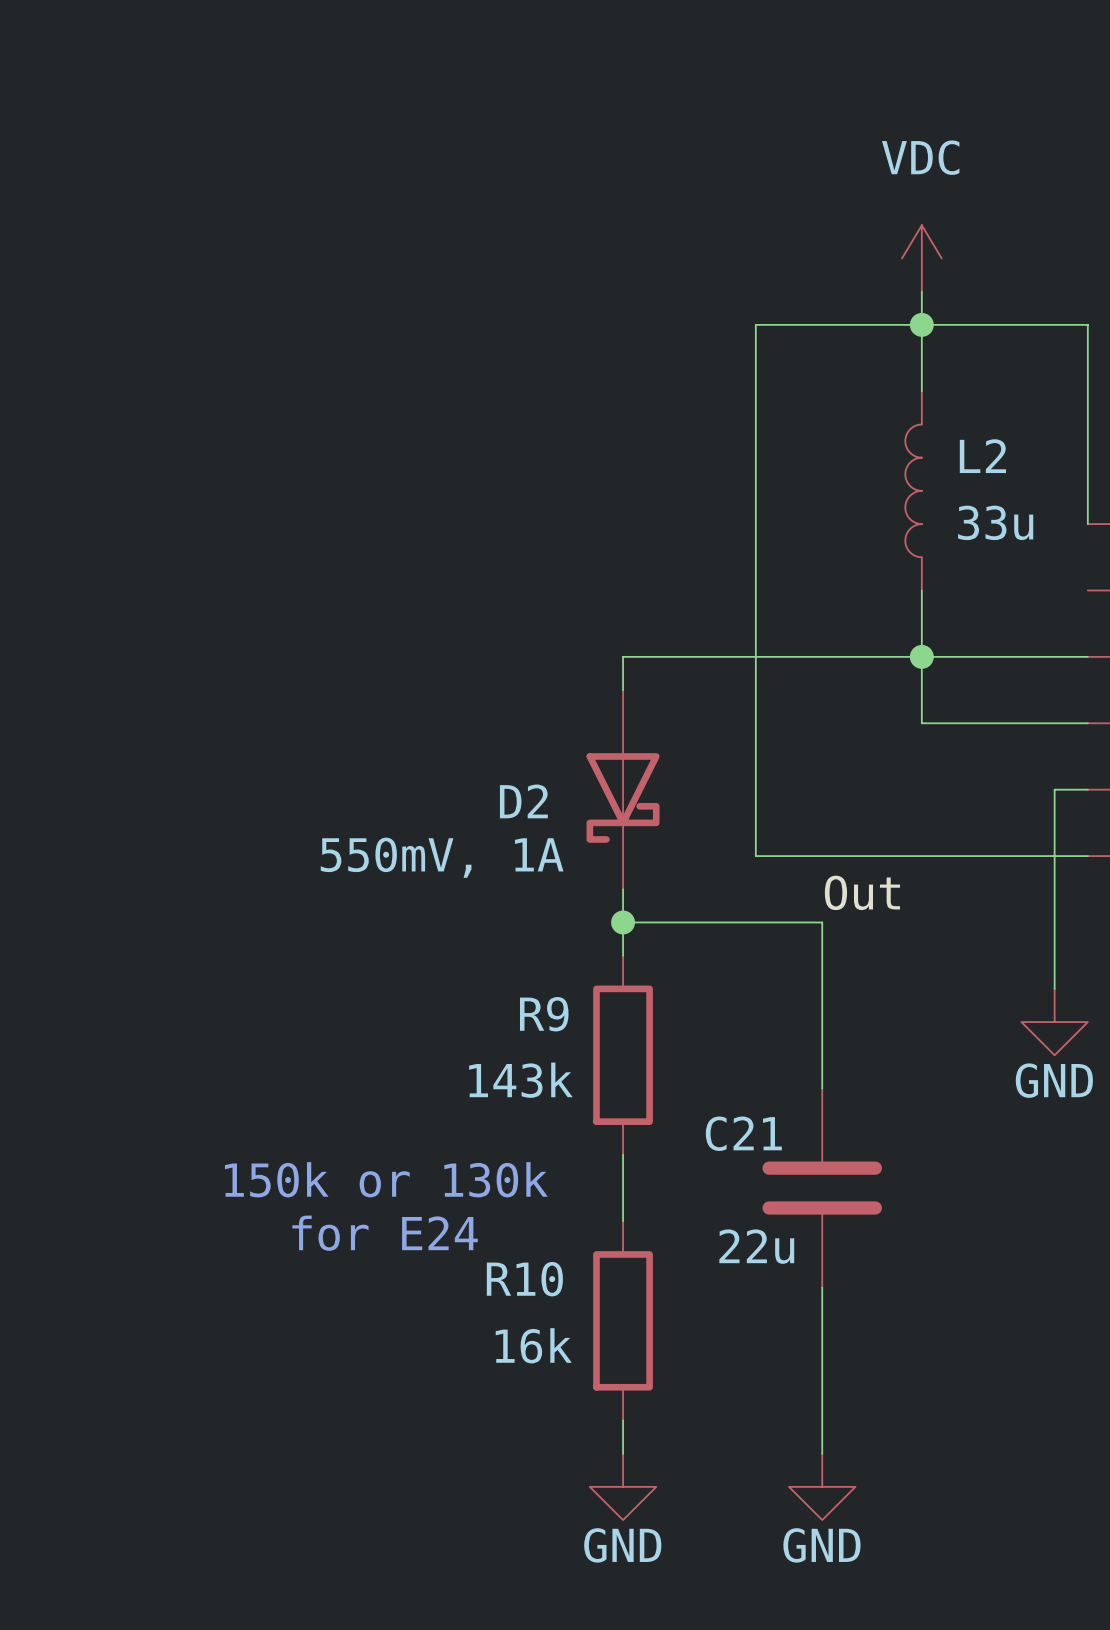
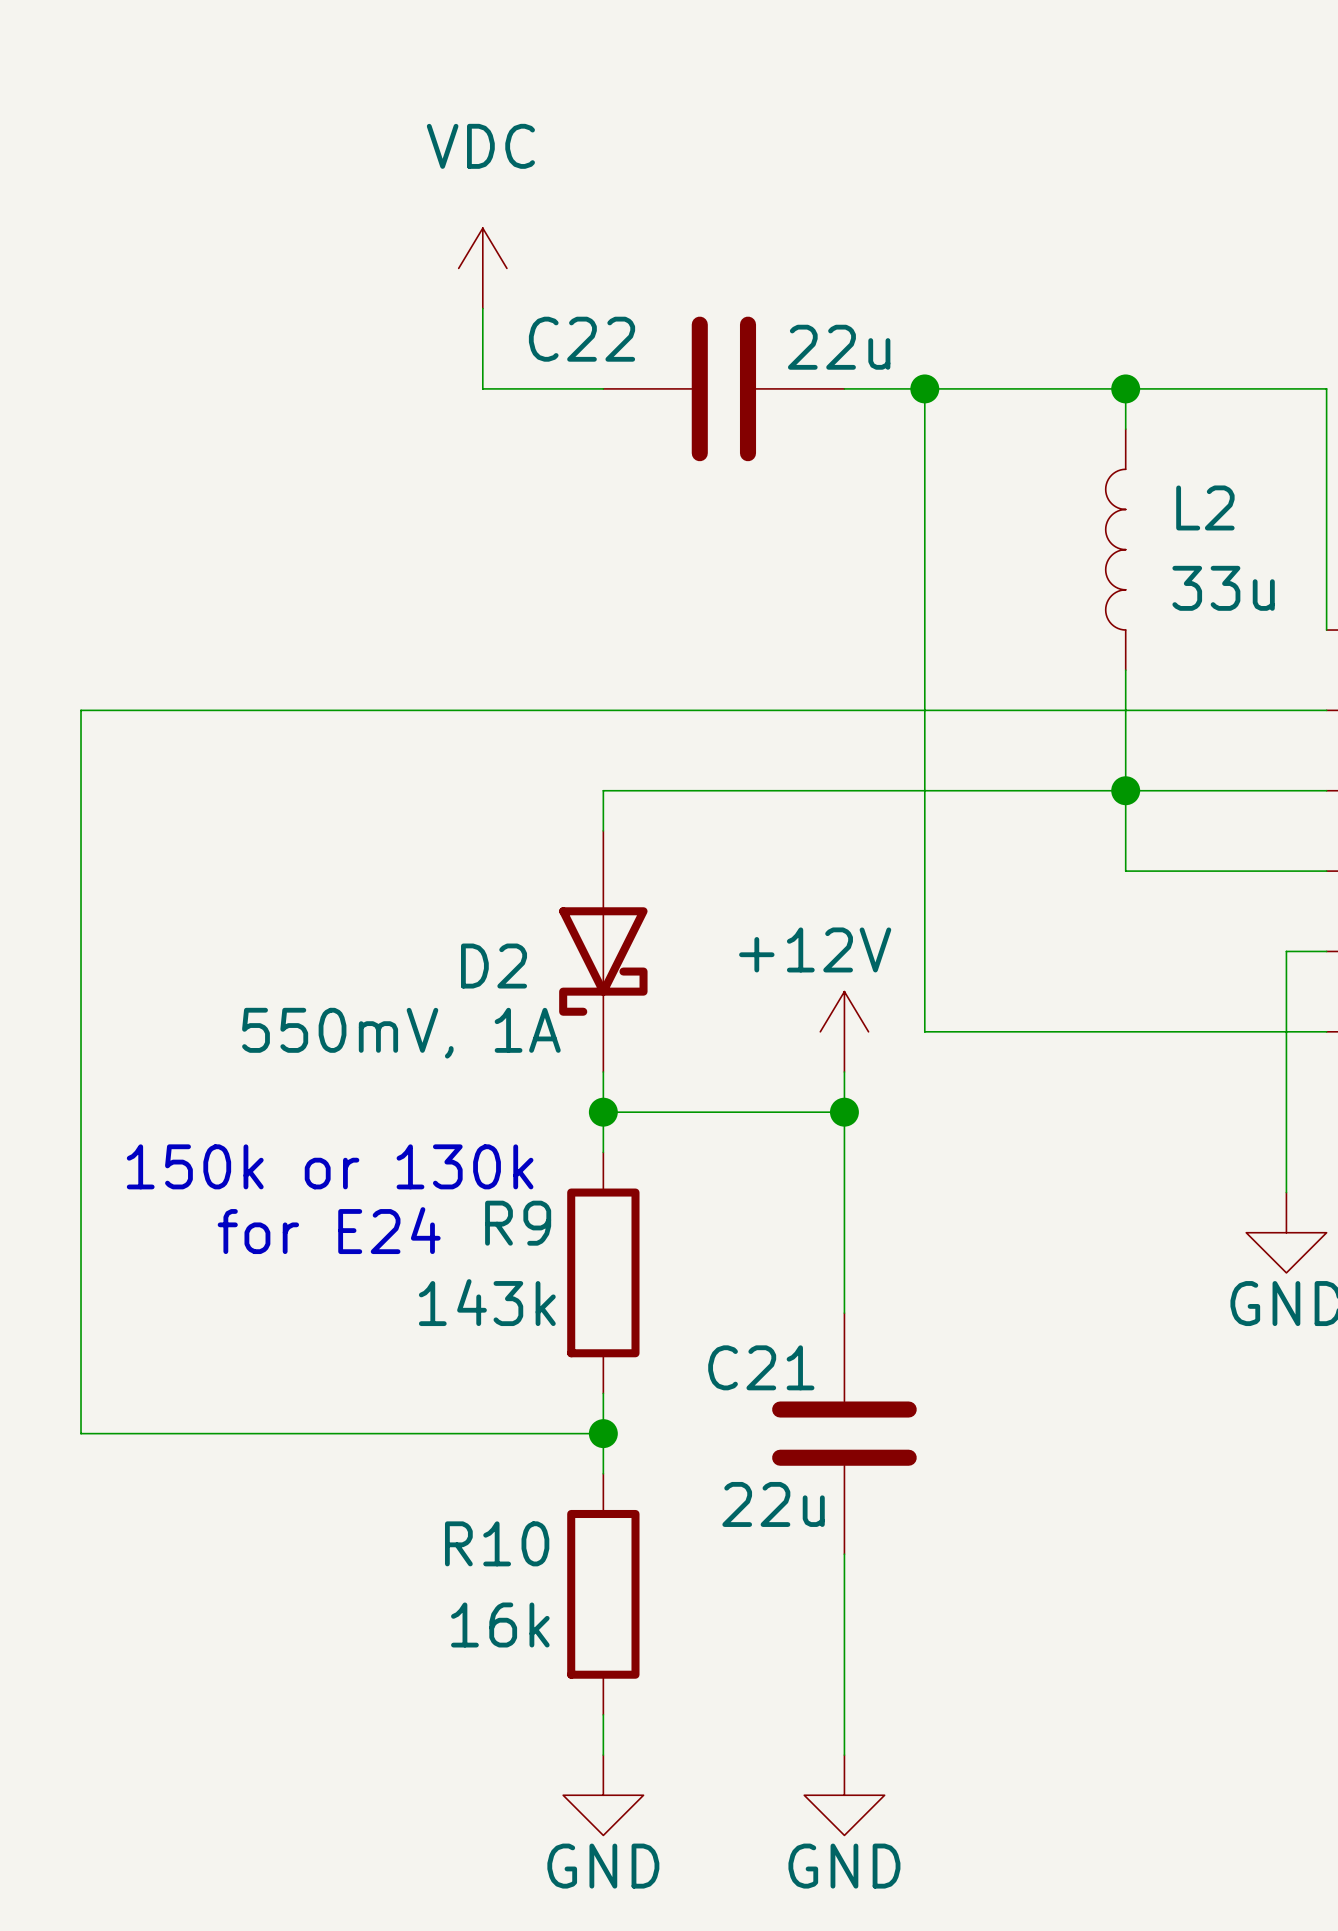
wire: none -> (482, 308) (482, 388) (603, 388)
power symbol position: VDC (921, 258) -> VDC (482, 268)
wire: (921, 291) (921, 324) -> none
C22: none -> 22u (723, 388)
wire: none -> (844, 388) (924, 388)
junction: none -> (924, 388)
L2 position: (913, 490) -> (1115, 549)
wire: none -> (1326, 710) (81, 710) (81, 1433) (603, 1433)
wire: (623, 656) (623, 690) -> (764, 790) (603, 790) (603, 830)
D2 position: (623, 789) -> (603, 951)
power symbol: none -> +12V (844, 1031)
wire: (623, 889) (623, 955) -> (603, 1072) (603, 1152)
wire: none -> (844, 1072) (844, 1313)
label: Out (862, 892) -> none
wire: none -> (603, 1112) (764, 1112)
junction: none -> (603, 1112)
junction: (623, 922) -> none
wire: (689, 922) (822, 922) (822, 1088) -> none
junction: none -> (844, 1112)
R9 position: (623, 1055) -> (603, 1272)
wire: (623, 1154) (623, 1221) -> (603, 1393) (603, 1473)
text position: 150k or 130k (386, 1179) -> 150k or 130k (330, 1166)
junction: none -> (603, 1433)
C21 position: (822, 1188) -> (844, 1433)
text position: for E24 (385, 1233) -> for E24 (329, 1230)
wire: (822, 1287) (822, 1453) -> (844, 1554) (844, 1755)
R10 position: (623, 1320) -> (603, 1594)
wire: (623, 1420) (623, 1453) -> (603, 1714) (603, 1755)
power symbol: none -> GND (603, 1795)
power symbol: GND (623, 1486) -> none
power symbol: none -> GND (844, 1795)
power symbol: GND (822, 1486) -> none

